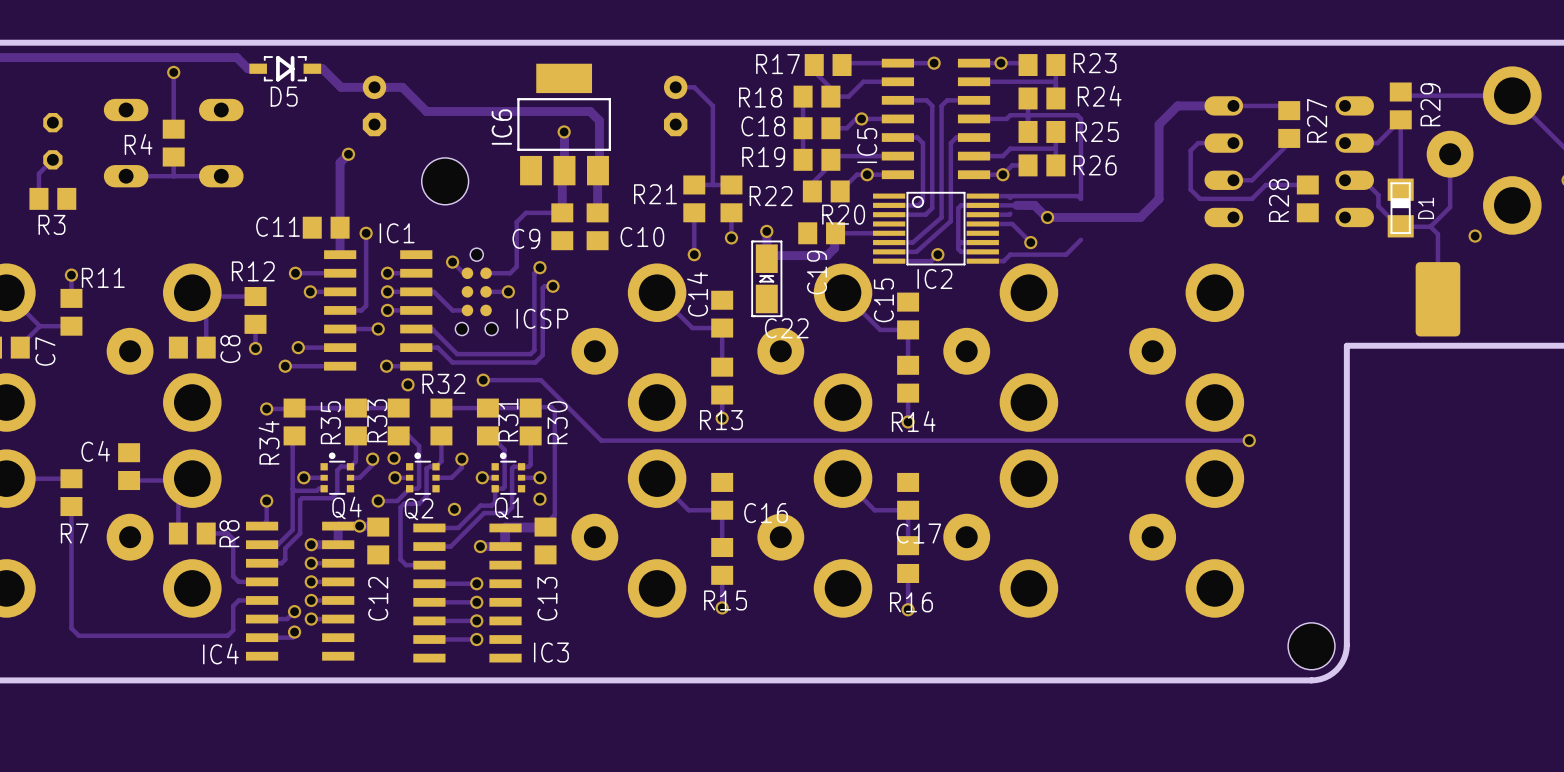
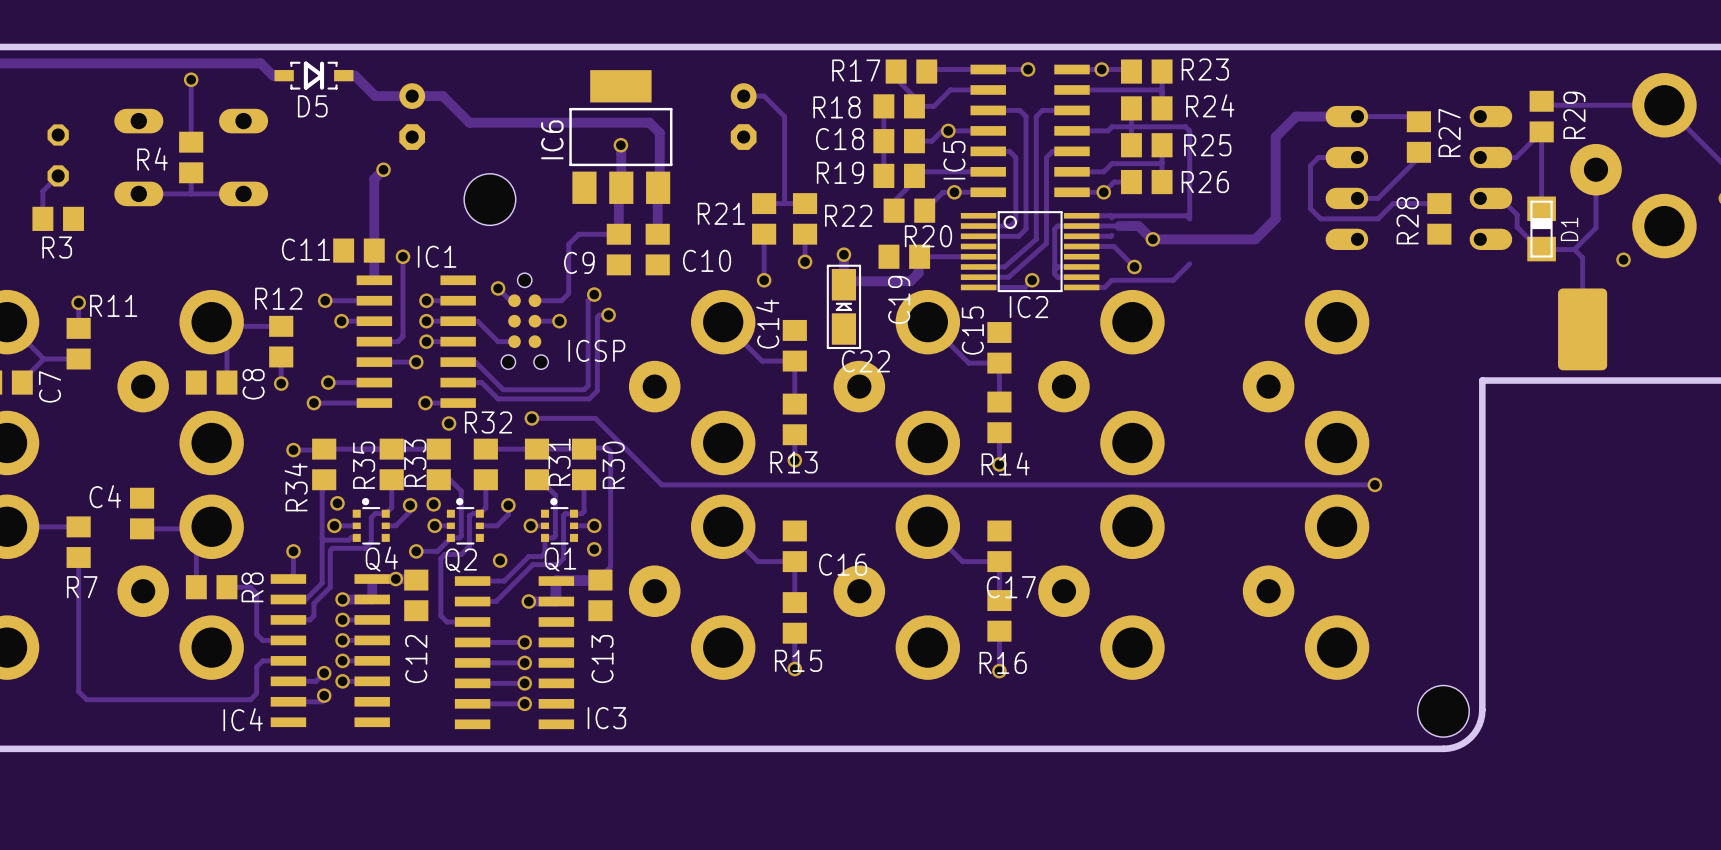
via: none -> (337, 503)

